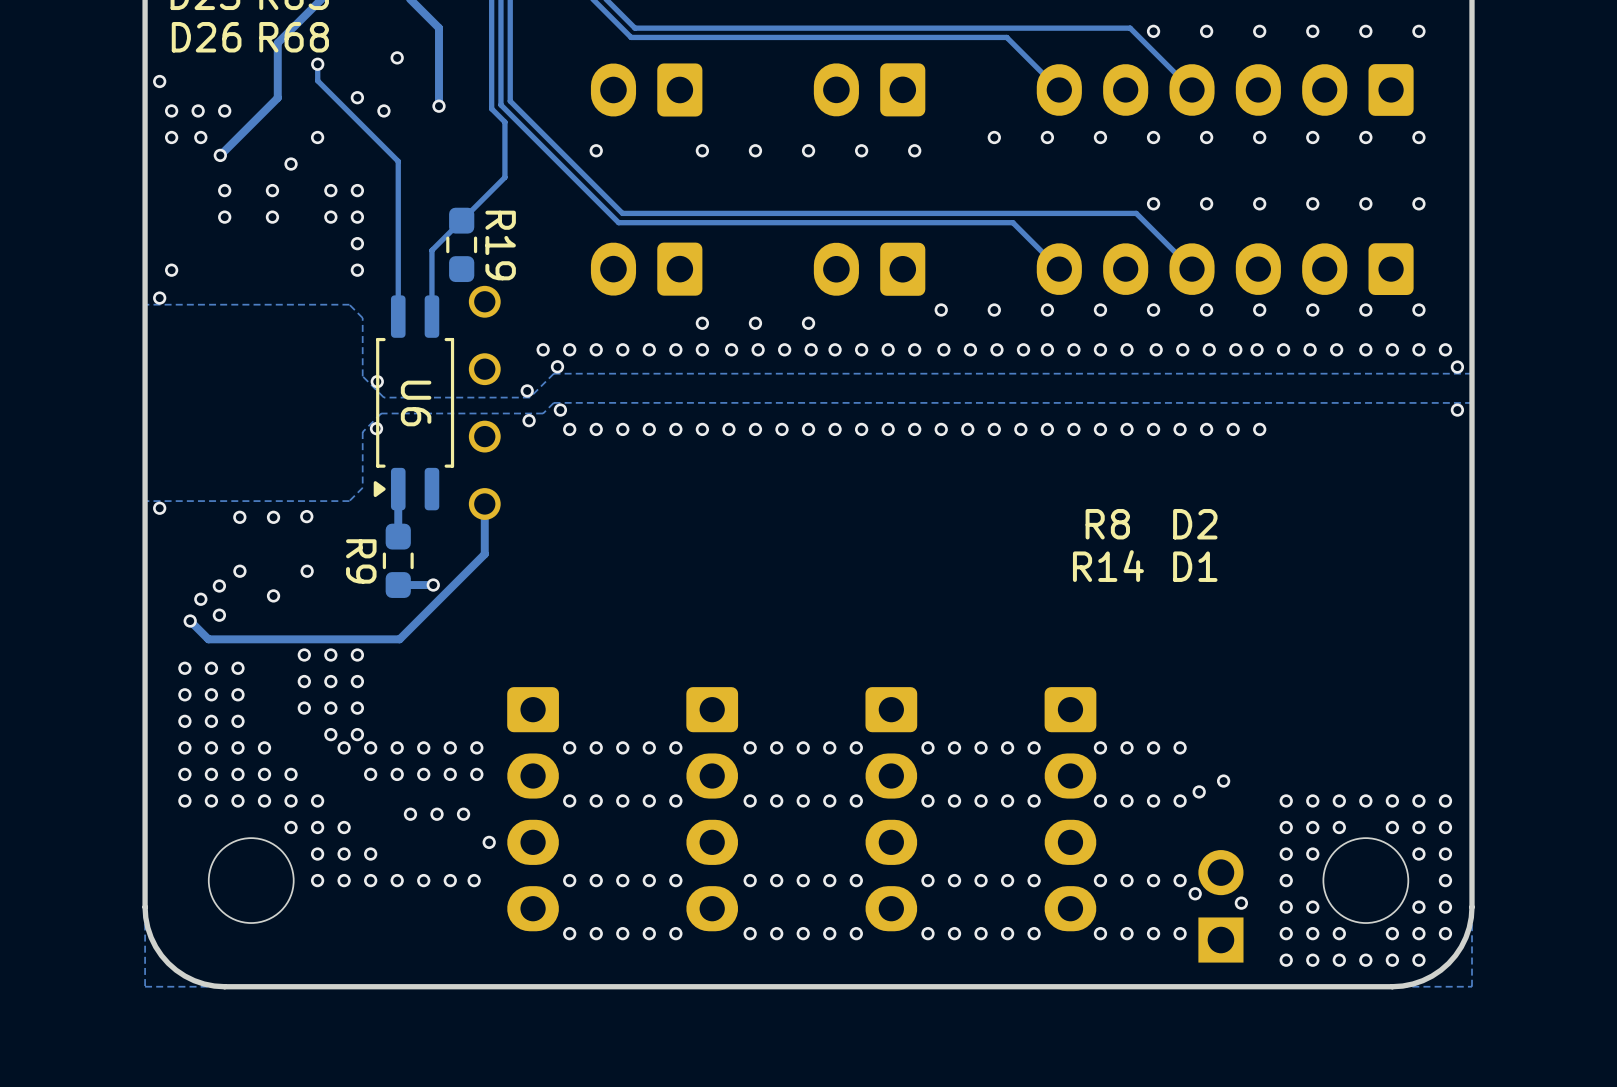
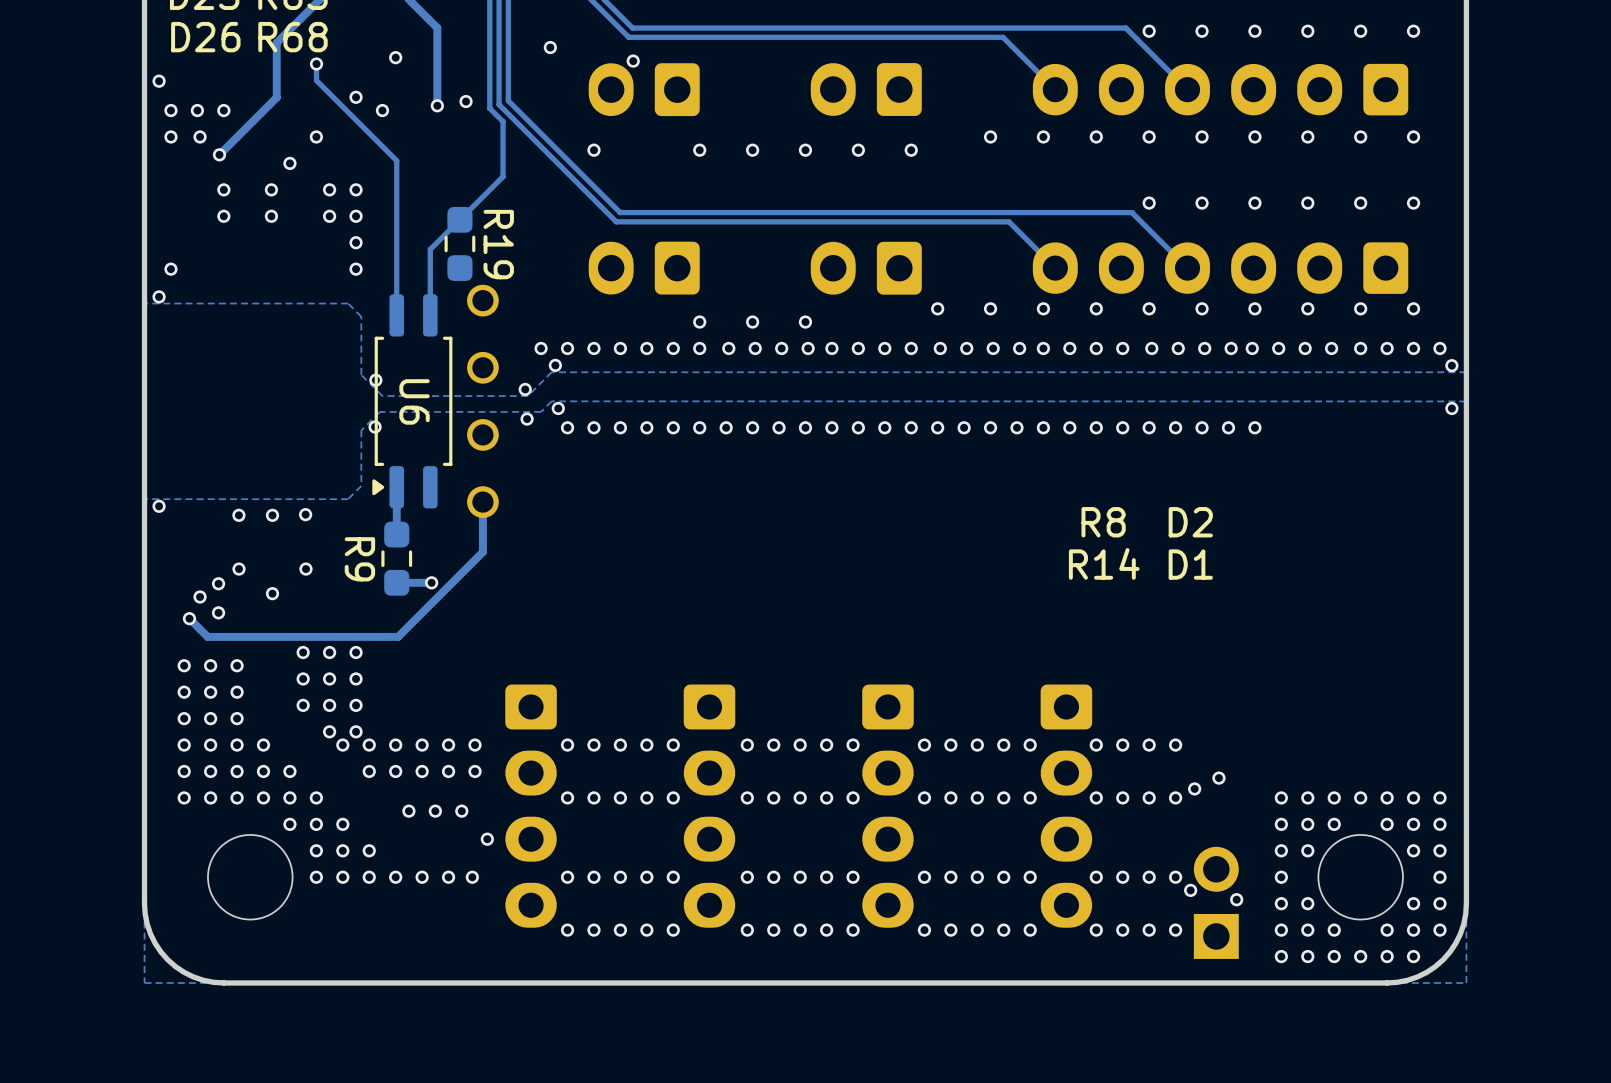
via: none -> (550, 47)
via: none -> (633, 61)
via: none -> (466, 101)

